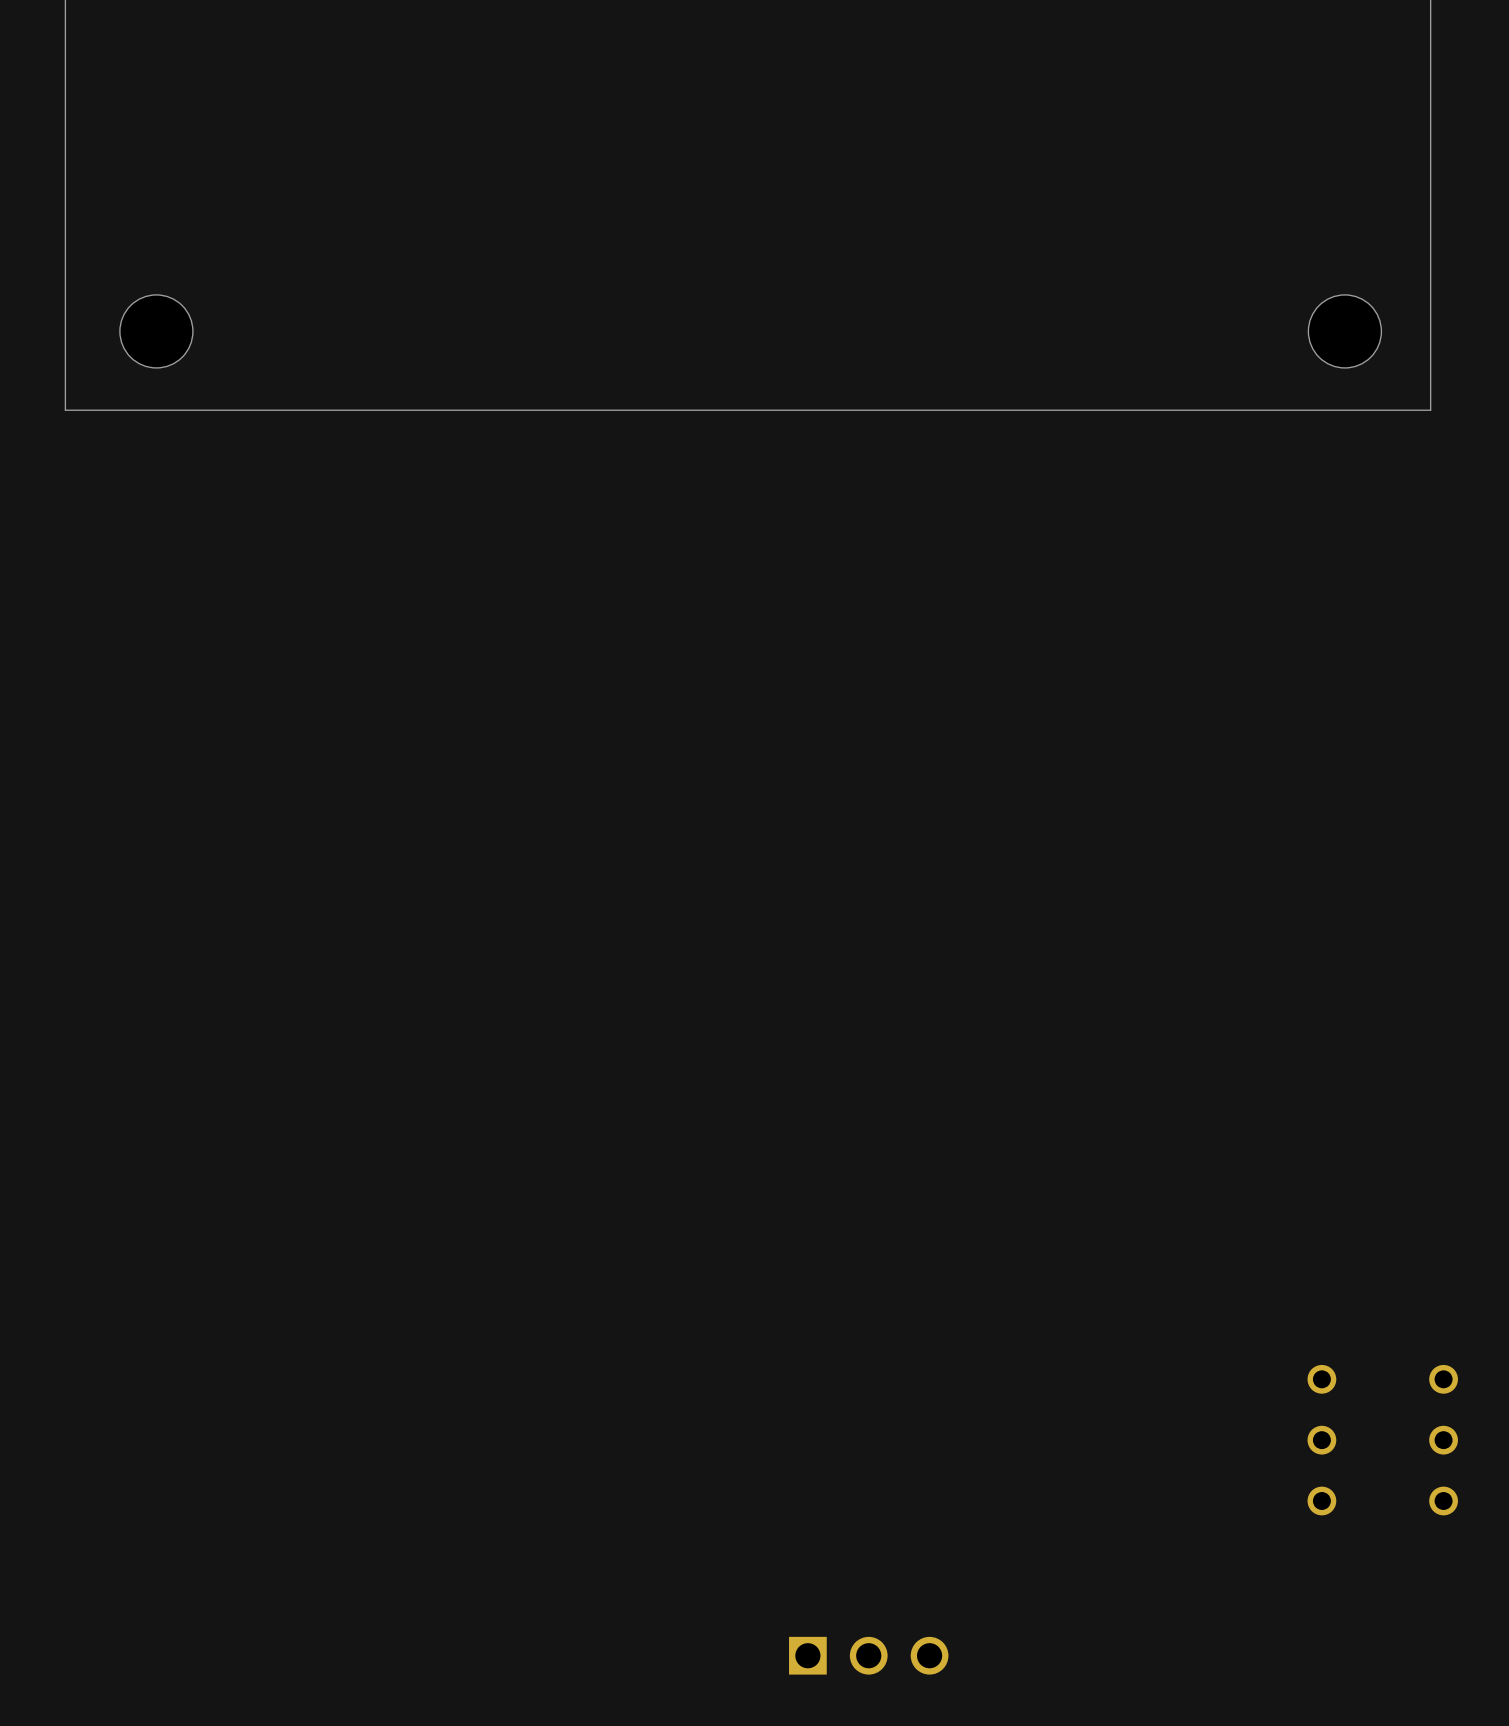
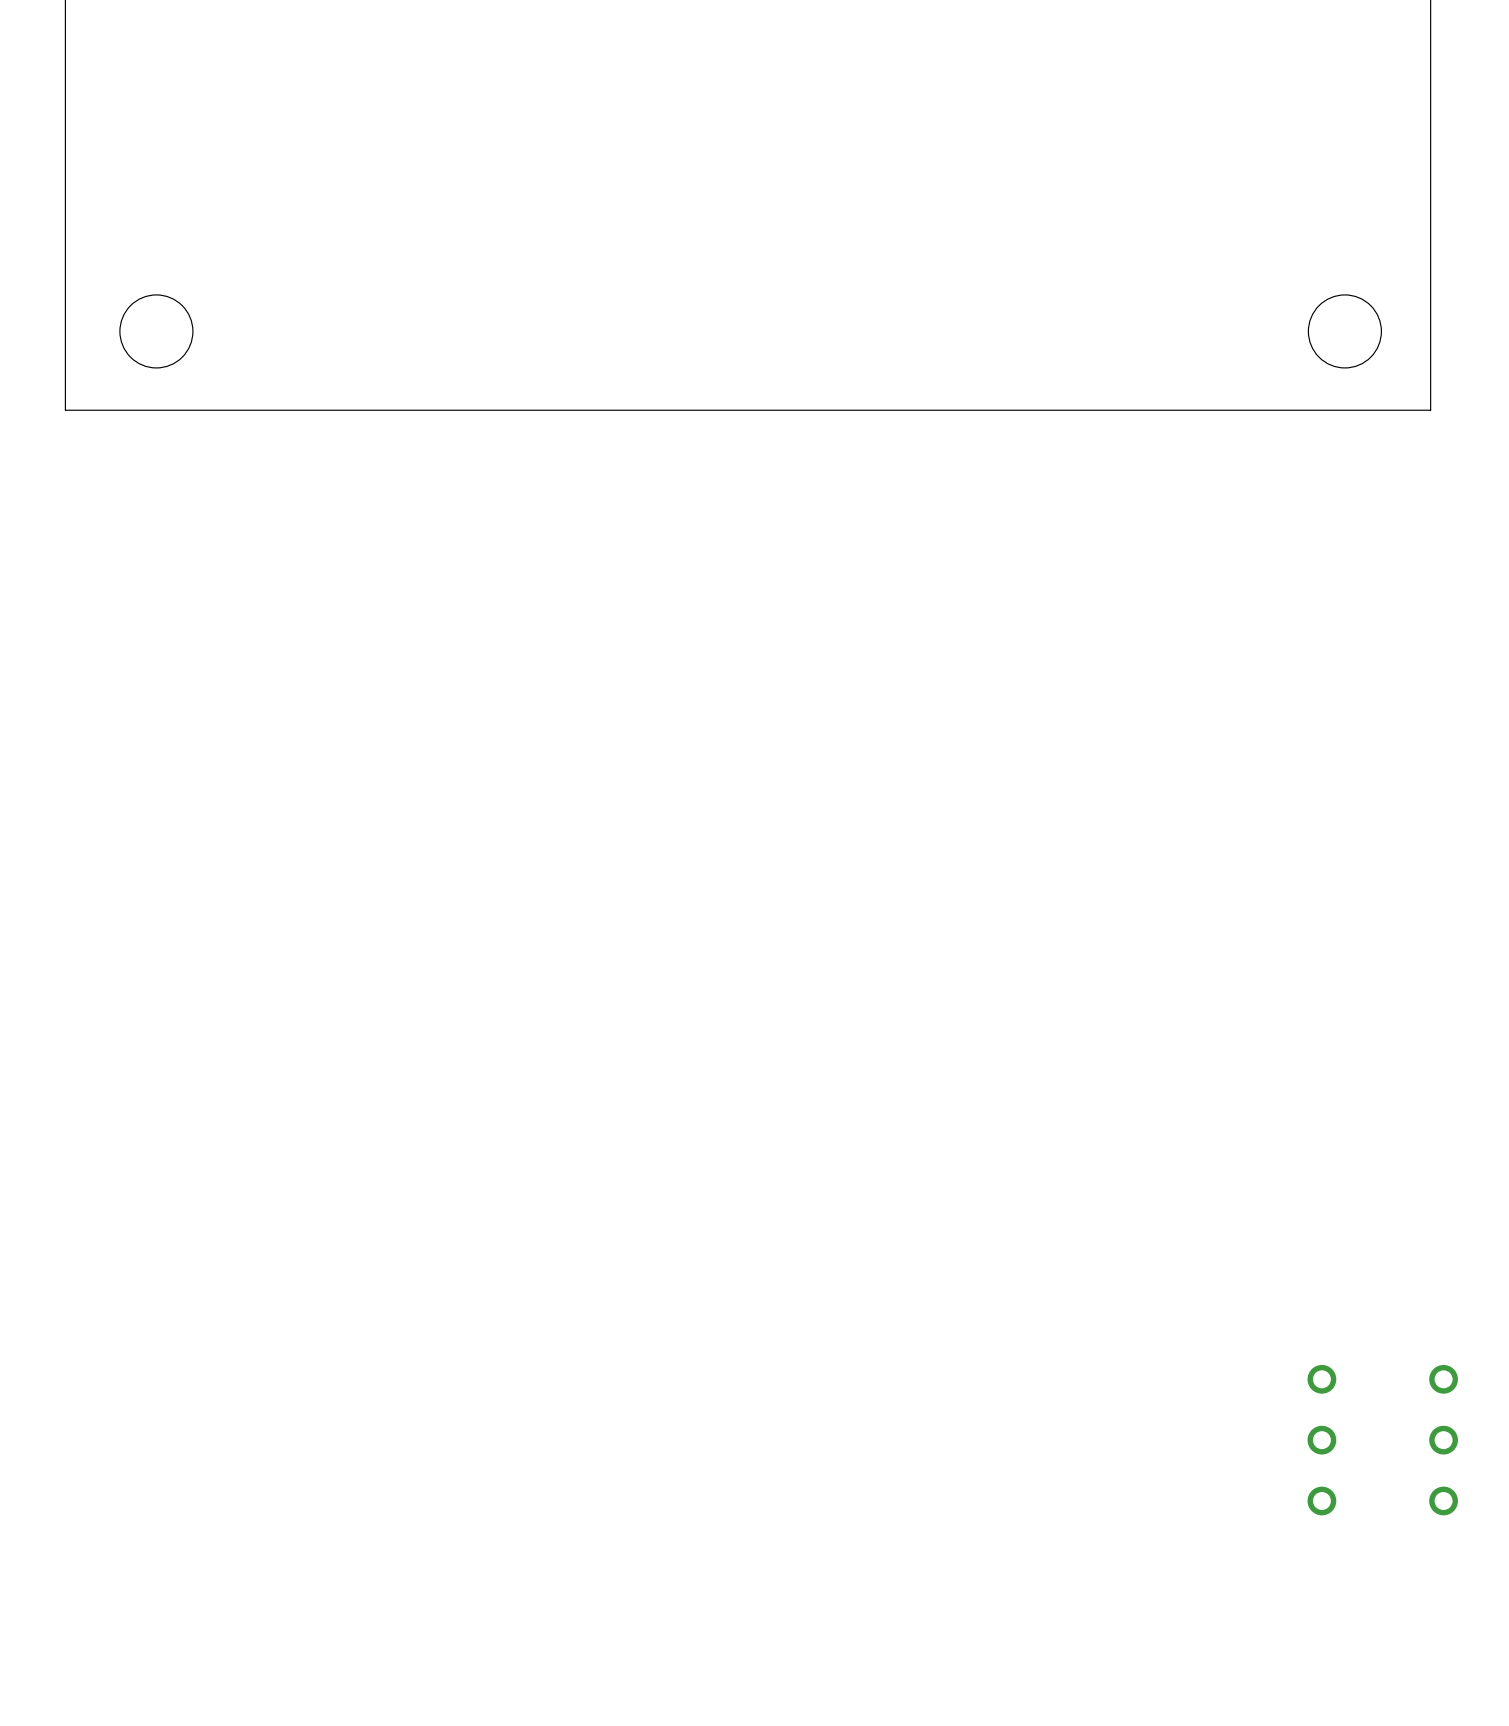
part: (868, 1655) -> none

